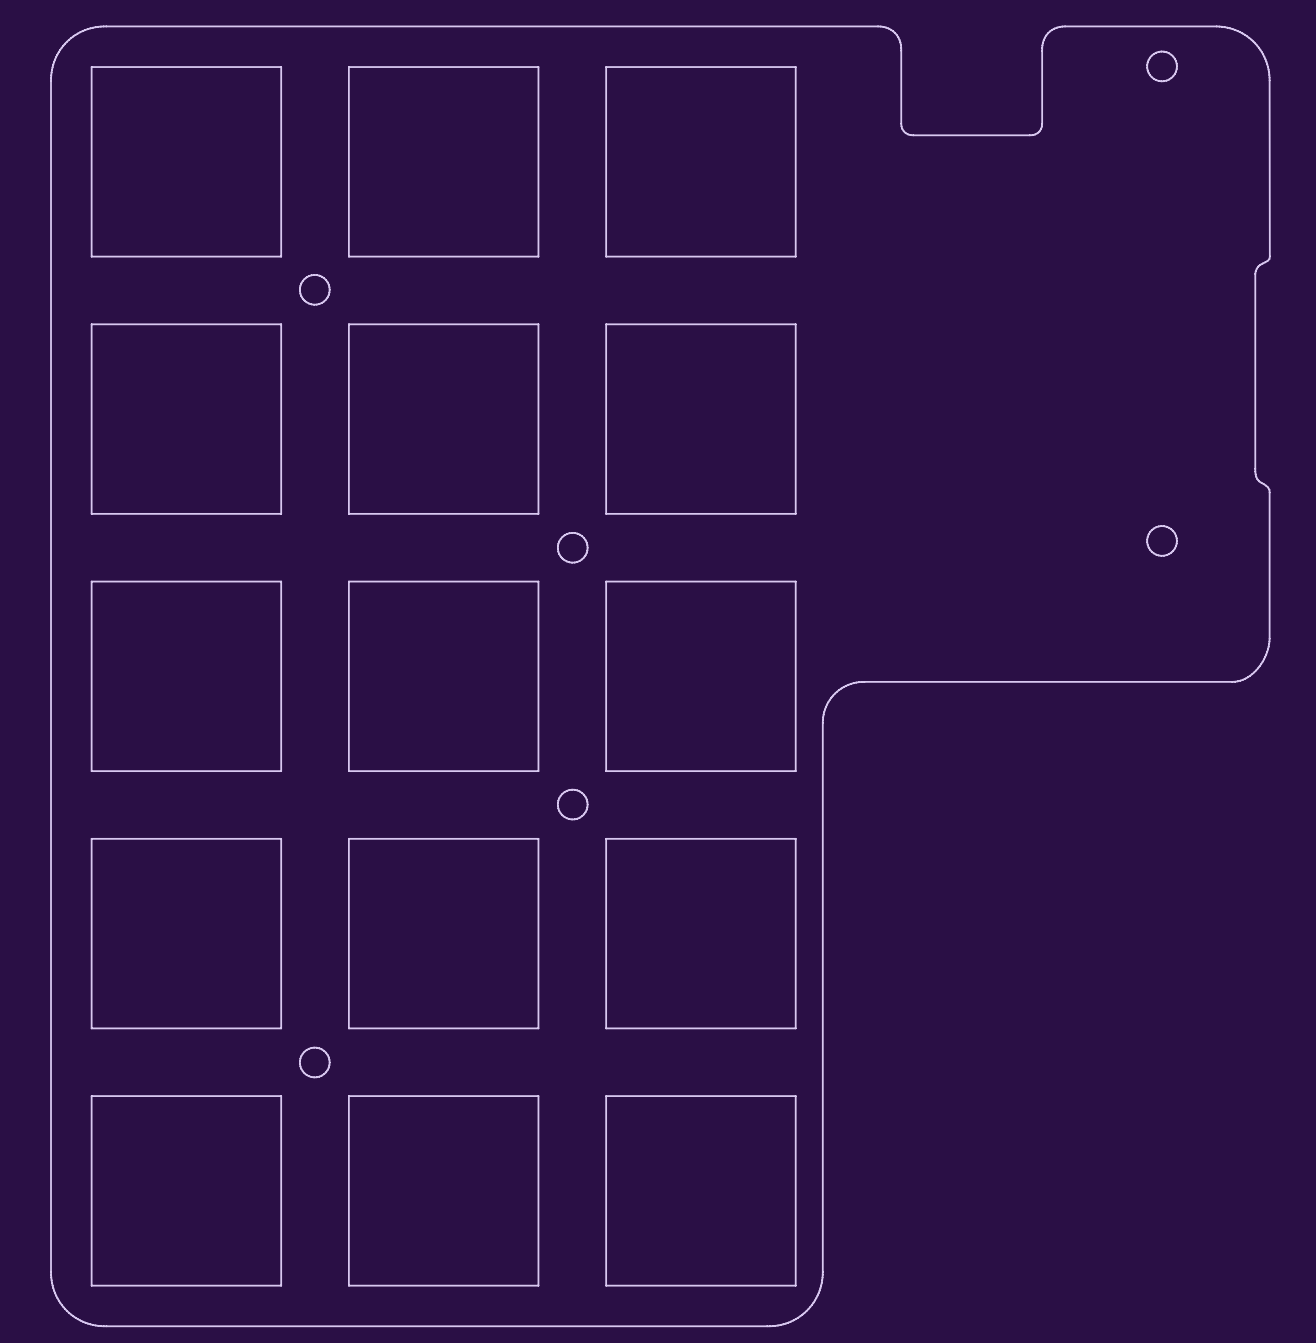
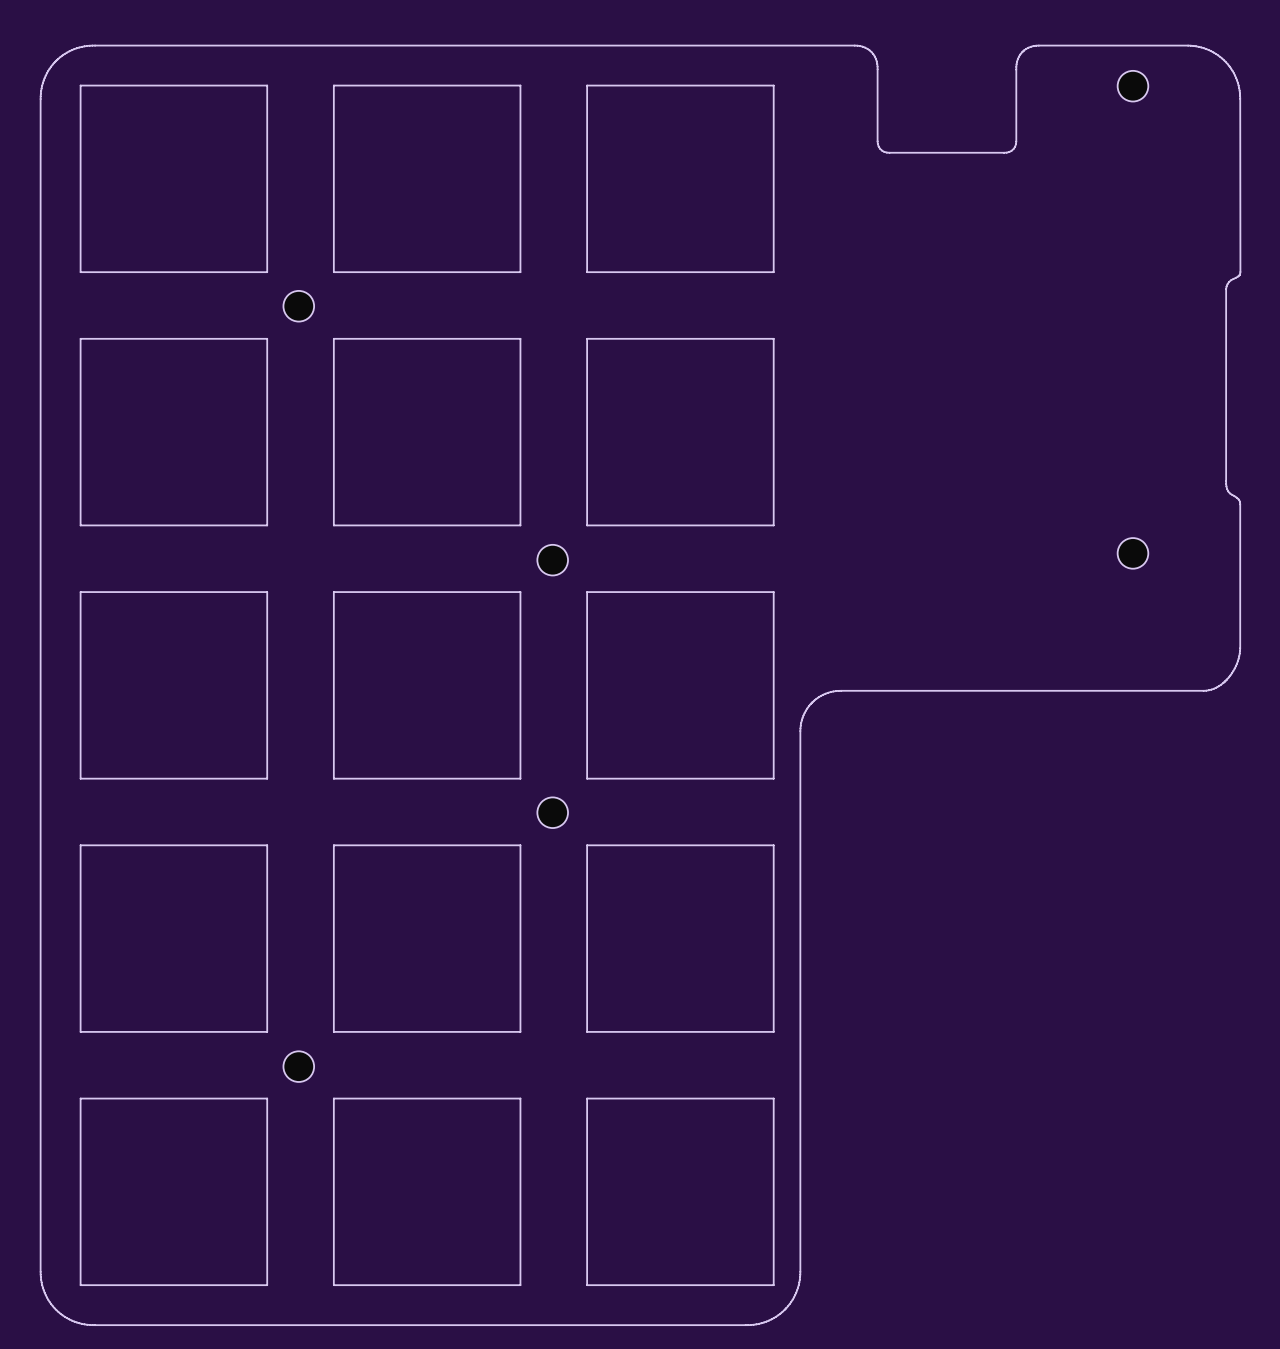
board edge: (1161, 51) (1151, 55) (1147, 67) (1153, 78) (1164, 81) (1174, 74) (1176, 63) (1171, 54) (1161, 51) -> none
hole: none -> (1132, 86)
board edge: (314, 274) (302, 281) (299, 291) (306, 302) (316, 304) (327, 297) (329, 287) (324, 278) (314, 274) -> none
hole: none -> (298, 306)
board edge: (1161, 526) (1151, 530) (1147, 542) (1153, 553) (1164, 555) (1174, 548) (1176, 538) (1171, 529) (1161, 526) -> none
board edge: (572, 532) (562, 537) (557, 549) (564, 560) (574, 562) (585, 555) (587, 545) (582, 536) (572, 532) -> none
hole: none -> (1132, 553)
hole: none -> (552, 560)
board edge: (572, 789) (562, 793) (557, 805) (564, 817) (574, 819) (585, 812) (587, 801) (582, 792) (572, 789) -> none
hole: none -> (552, 812)
board edge: (314, 1047) (304, 1051) (299, 1063) (306, 1074) (316, 1077) (325, 1072) (329, 1062) (324, 1050) (314, 1047) -> none
hole: none -> (298, 1066)

